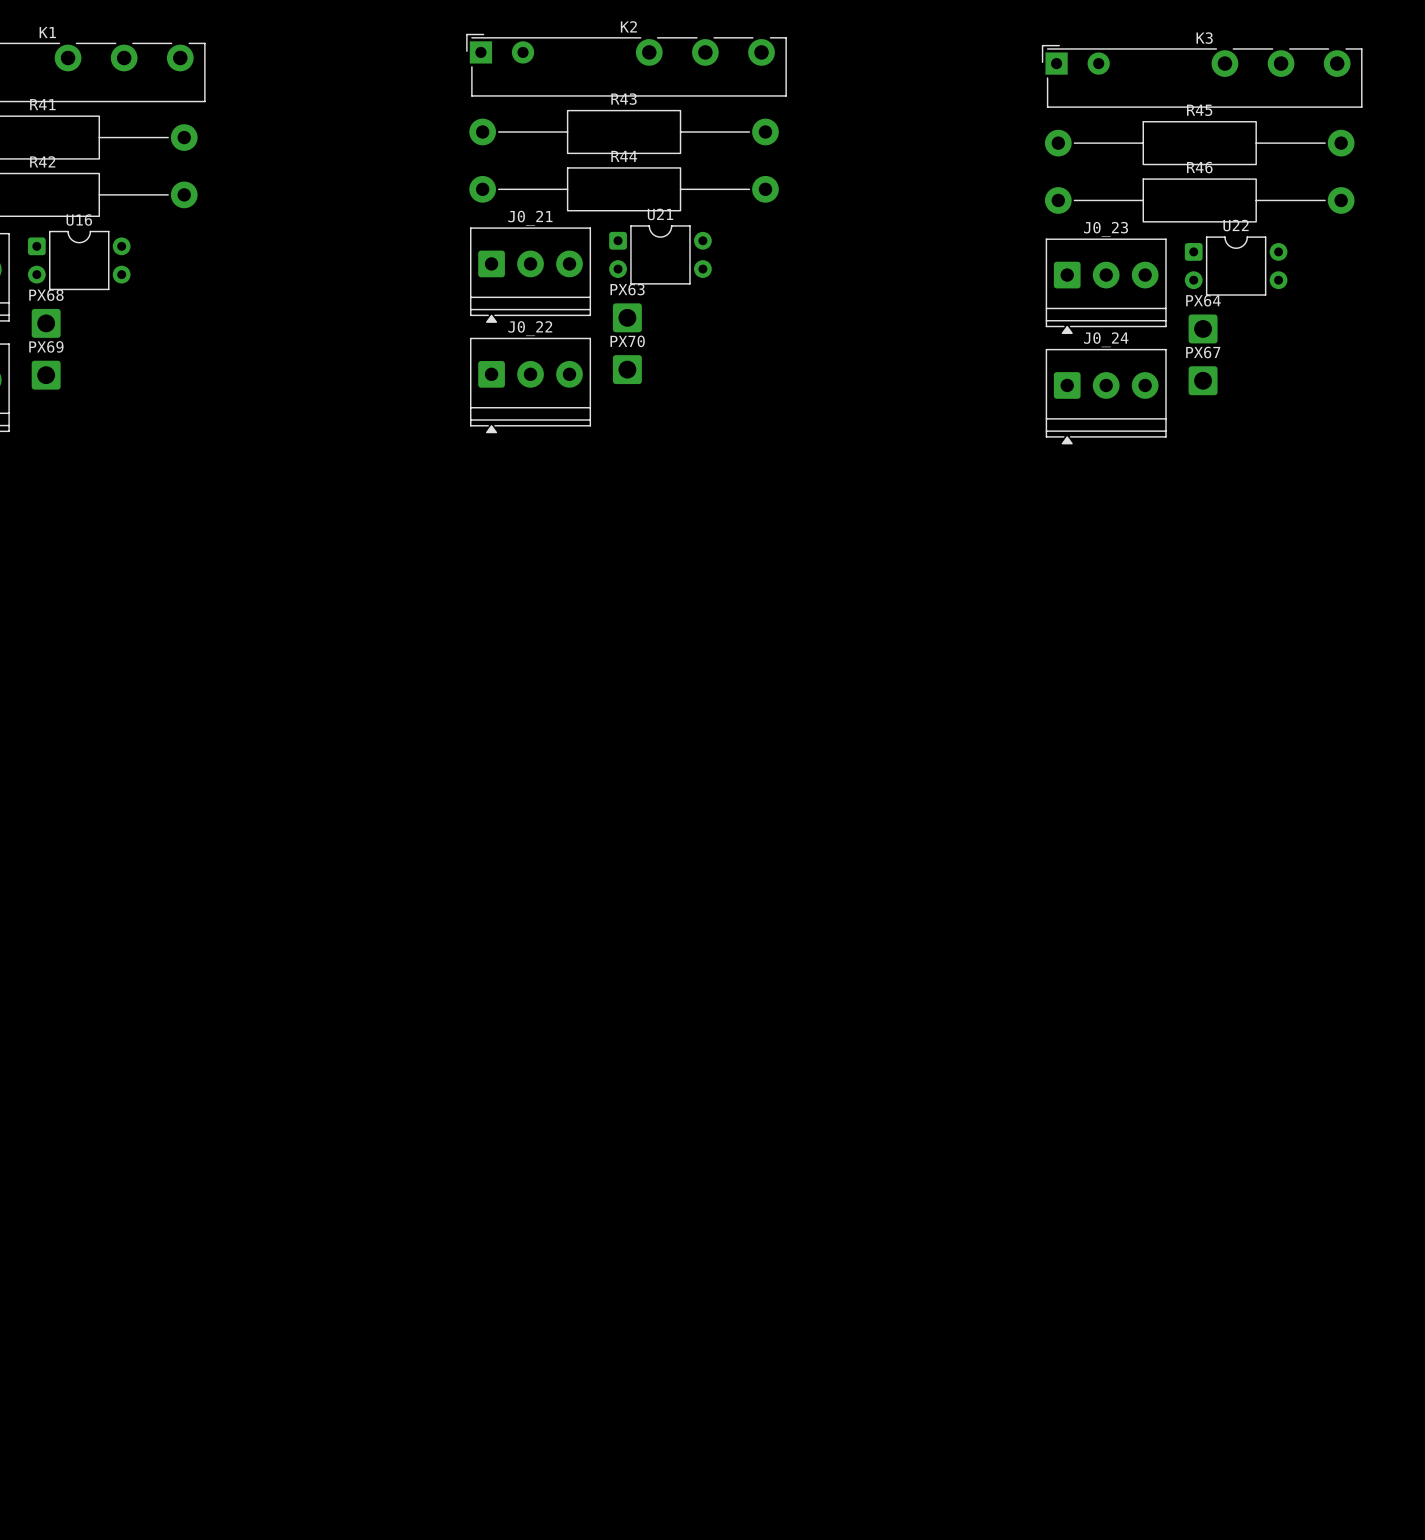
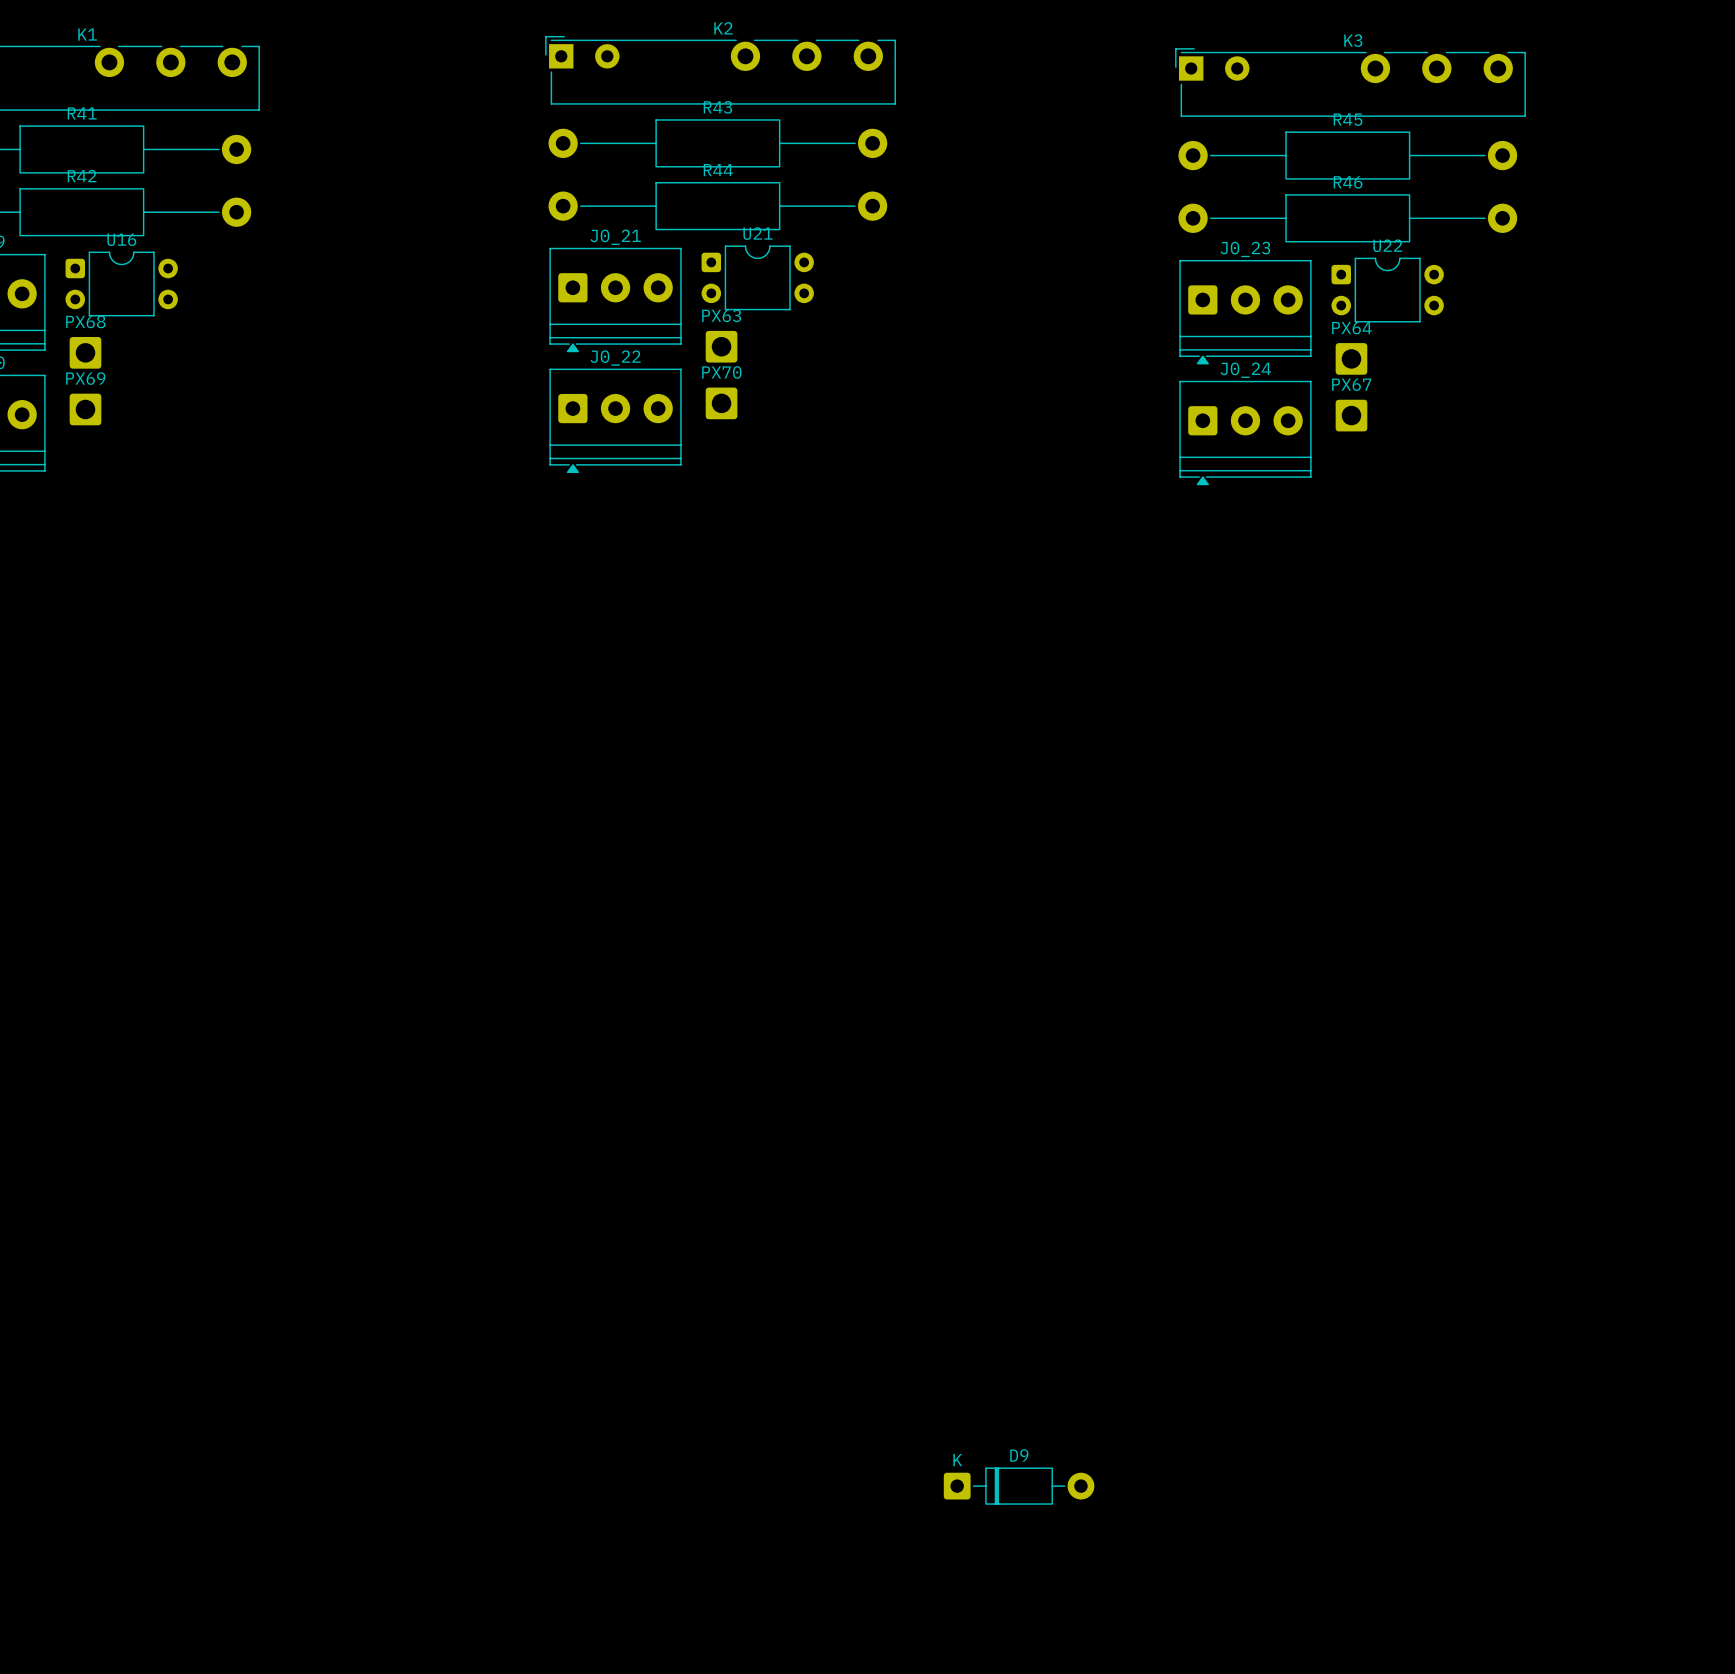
D9: none -> (1019, 1486)

